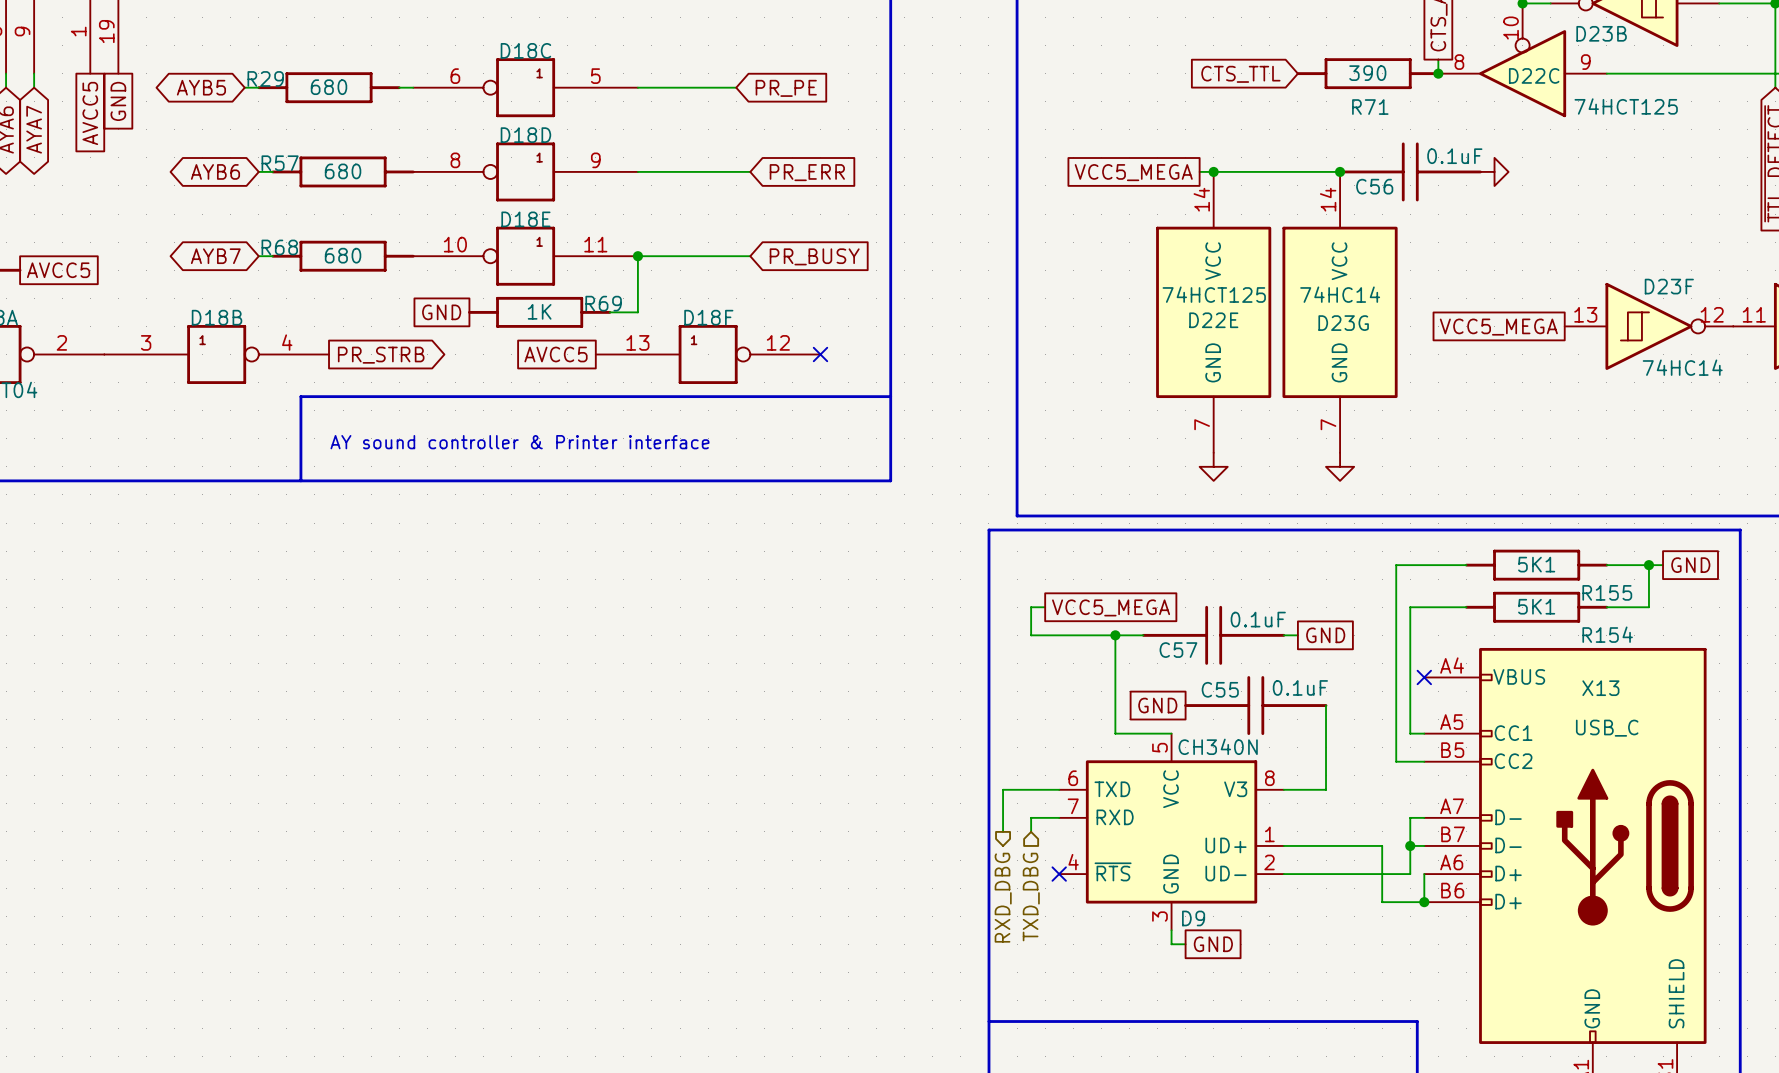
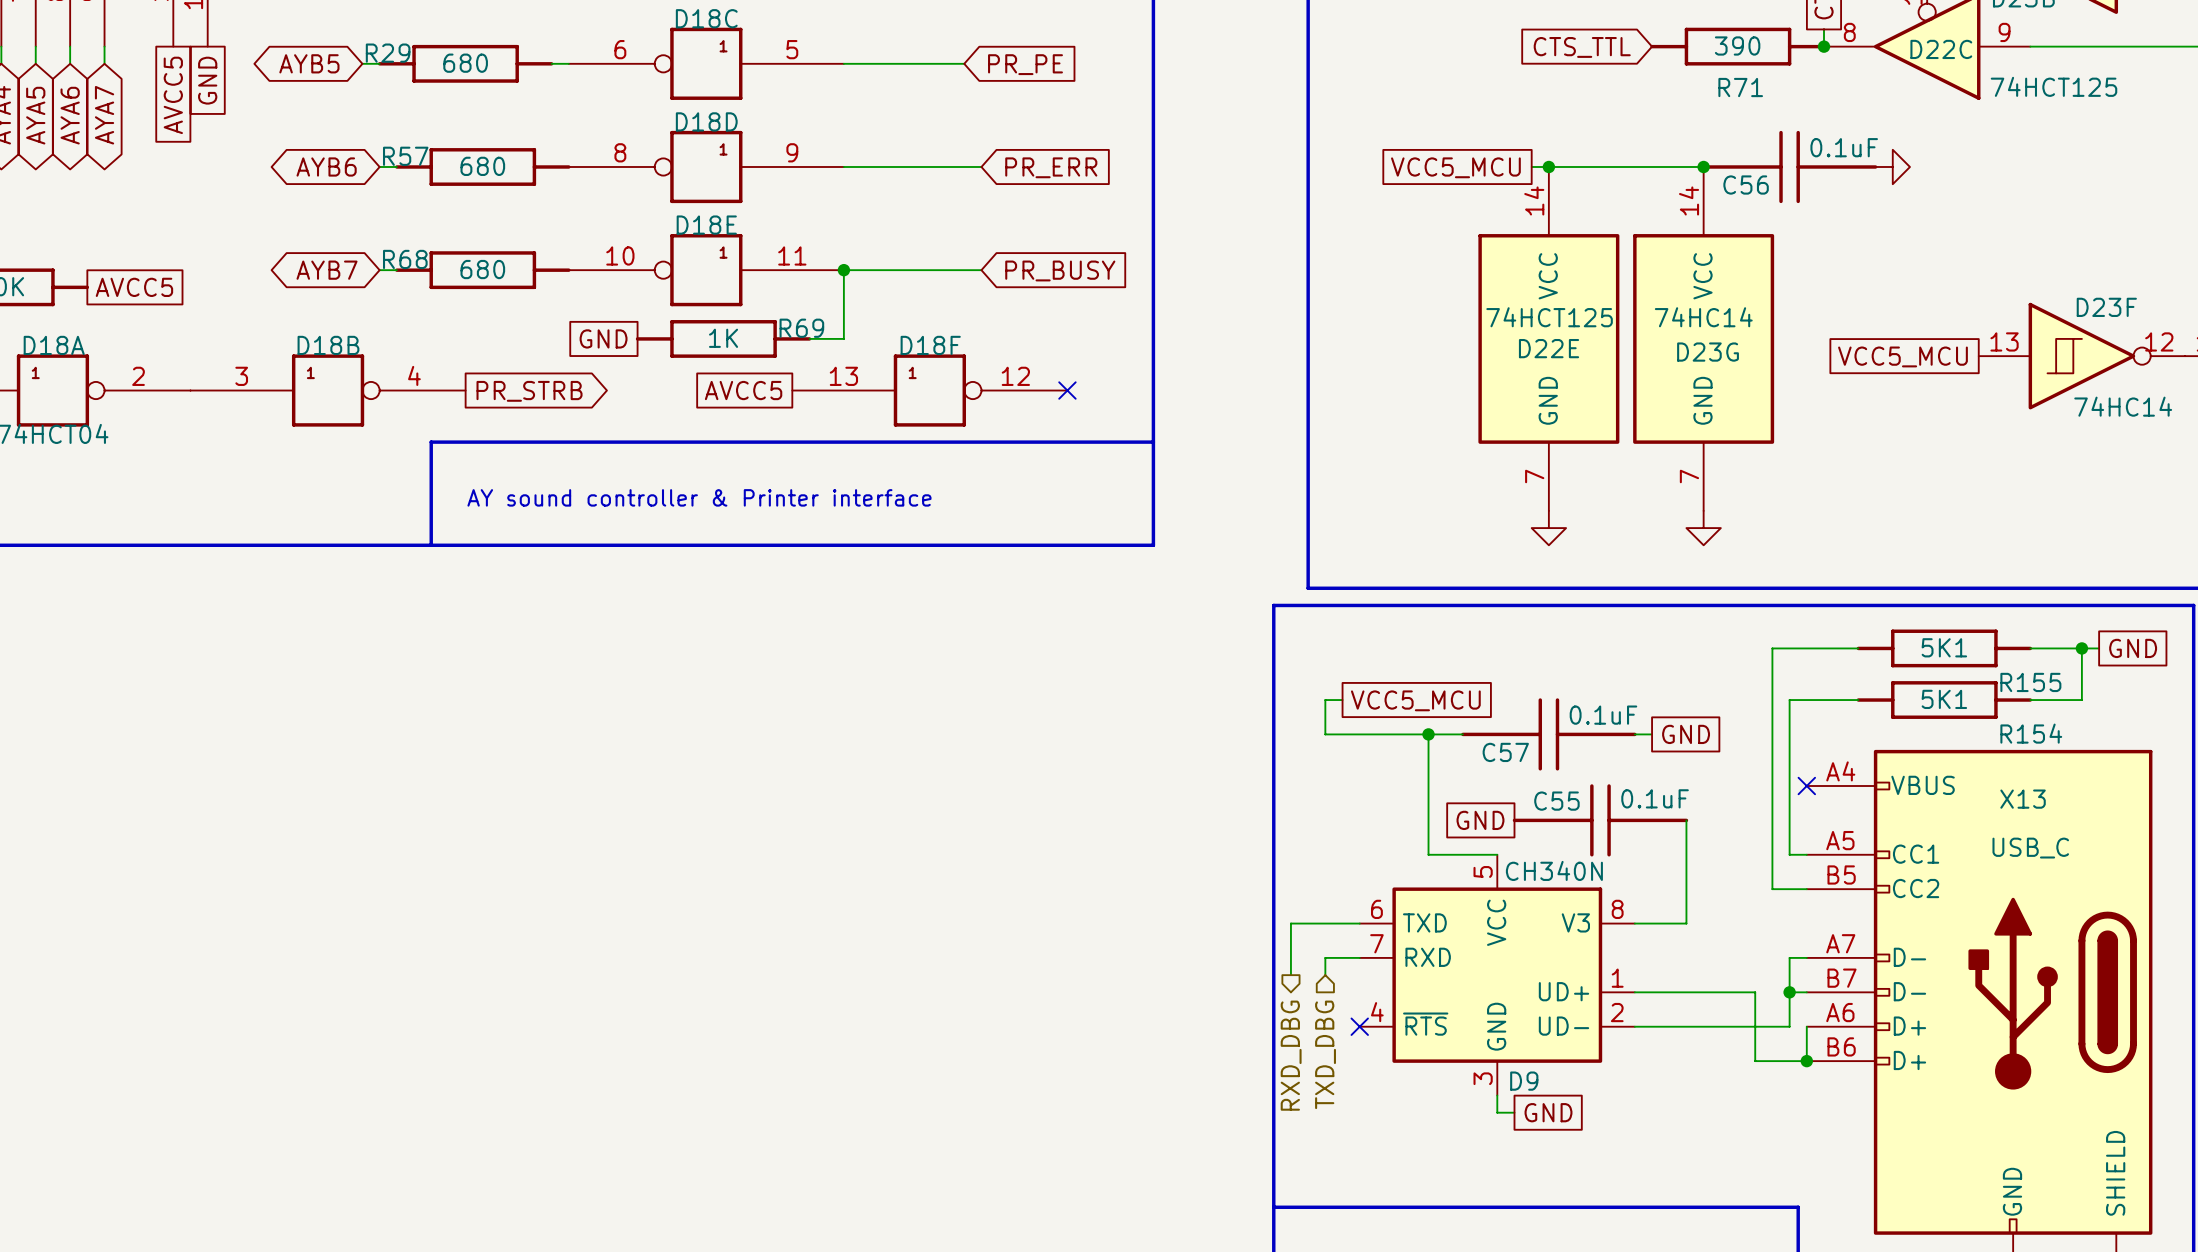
global label: VCC5_MEGA (1133, 172) -> VCC5_MCU (1455, 167)
global label: VCC5_MEGA (1498, 327) -> VCC5_MCU (1902, 356)
global label: VCC5_MEGA (1111, 607) -> VCC5_MCU (1415, 700)

